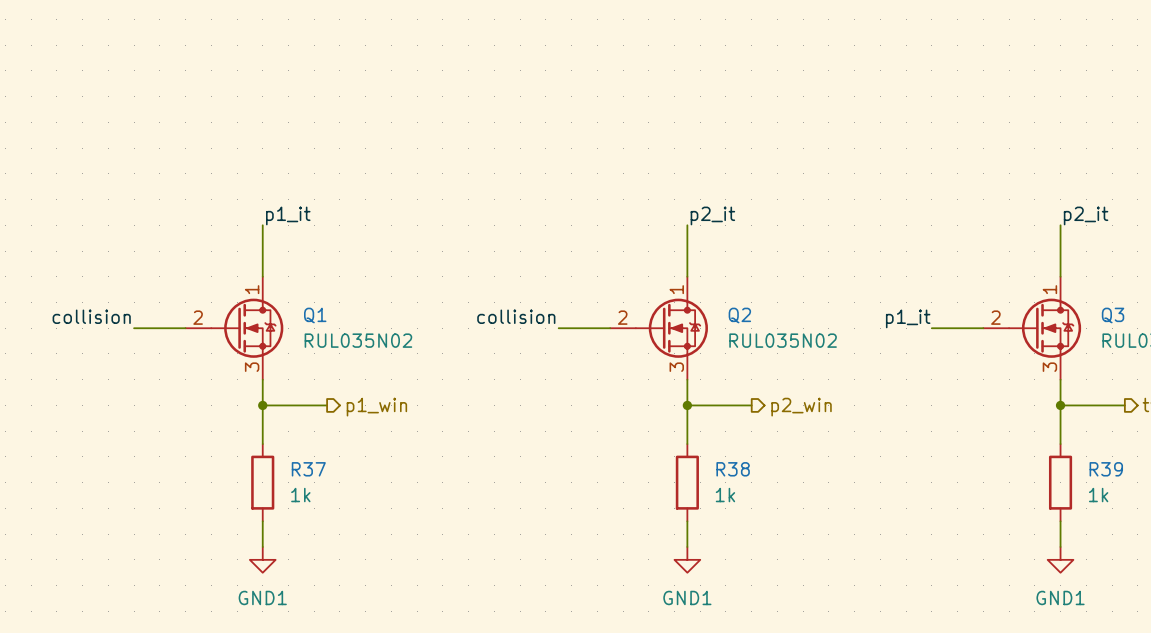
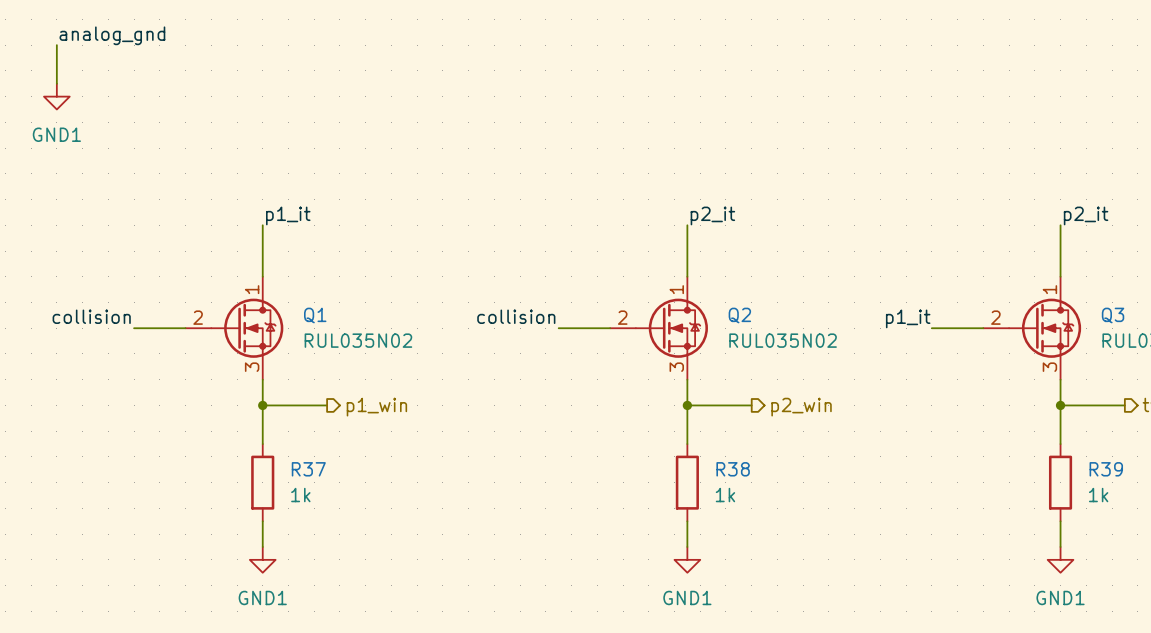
label: none -> analog_gnd (112, 35)
wire: none -> (56, 45) (56, 83)
power symbol: none -> GND1 (56, 96)

